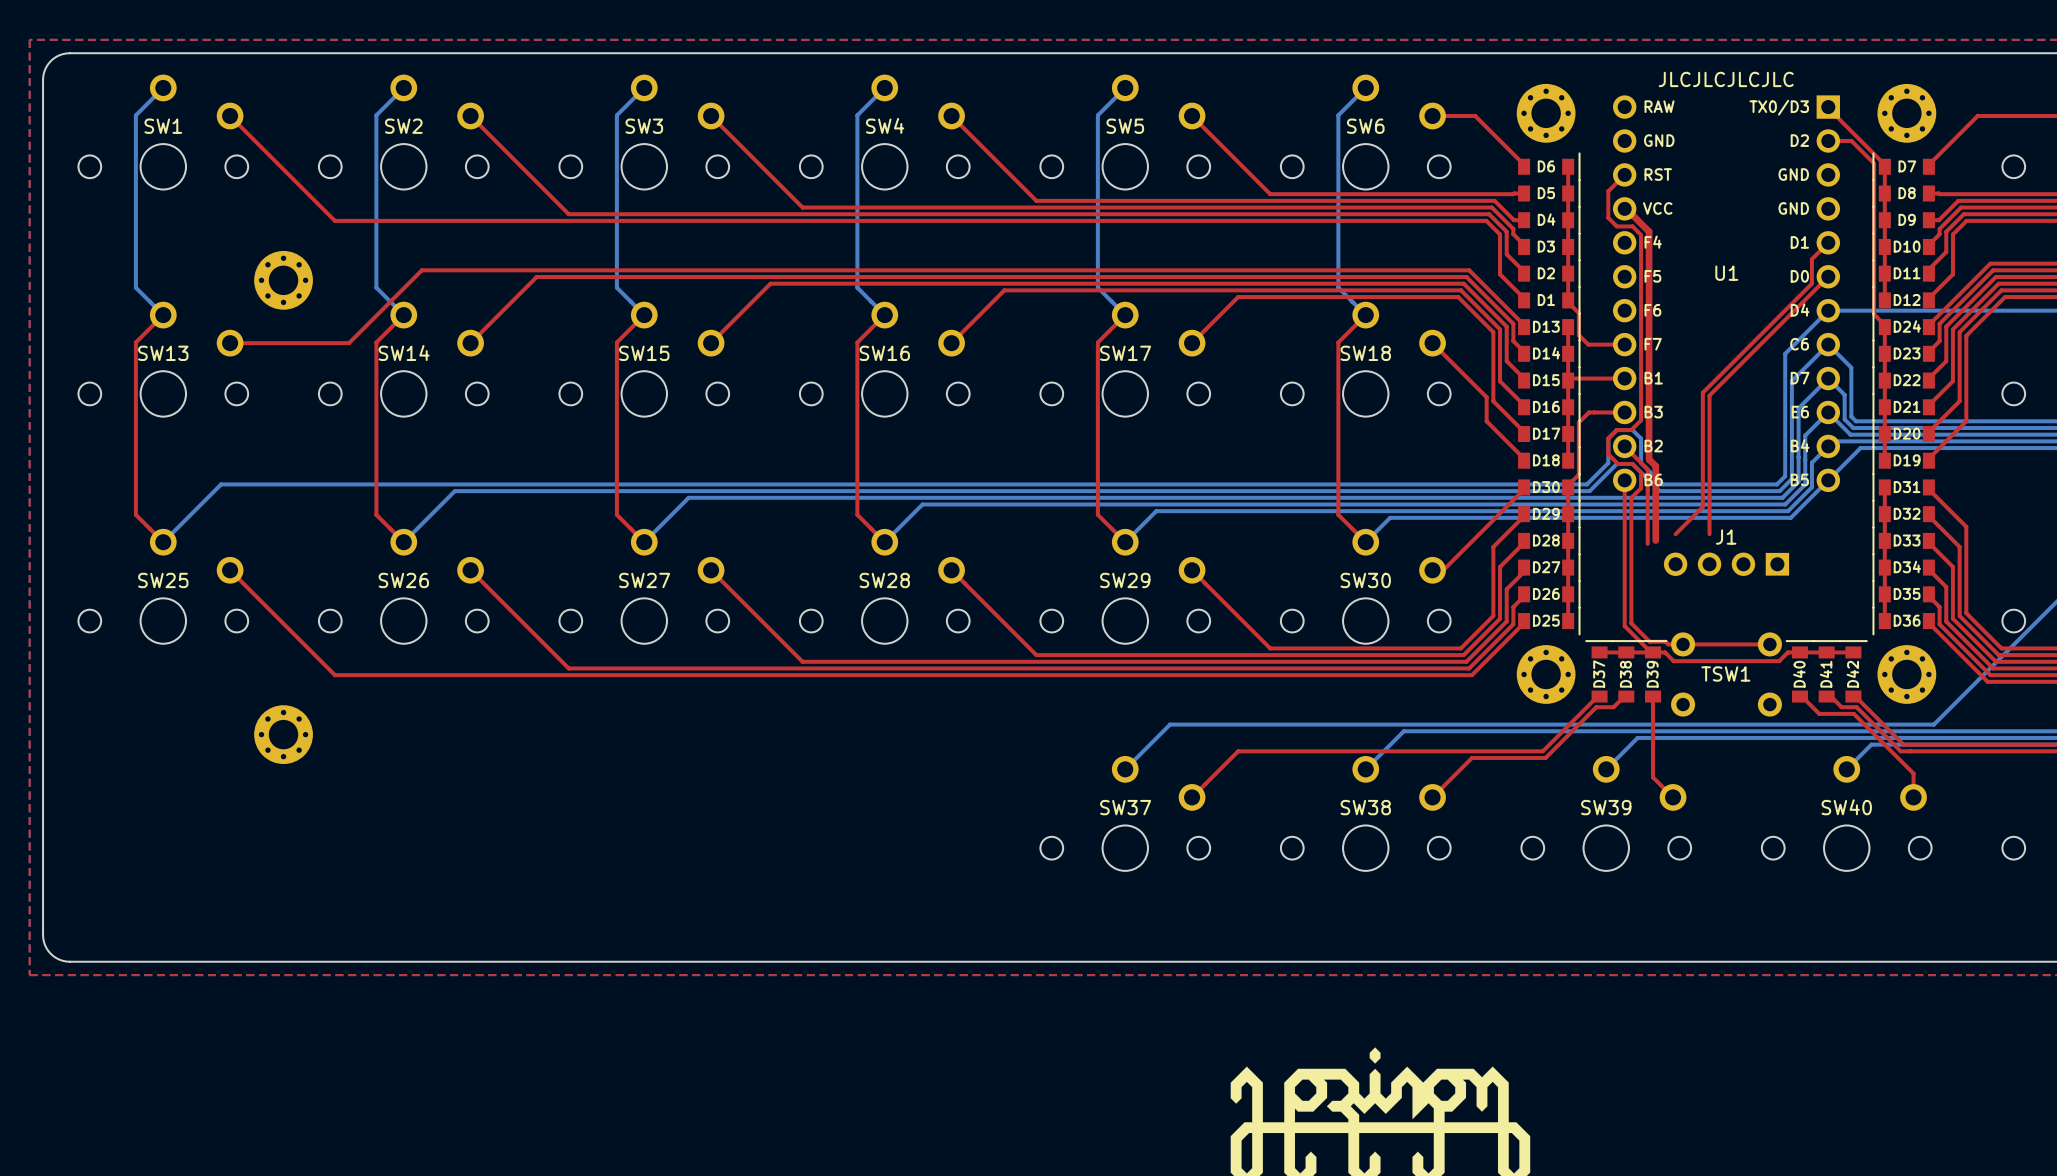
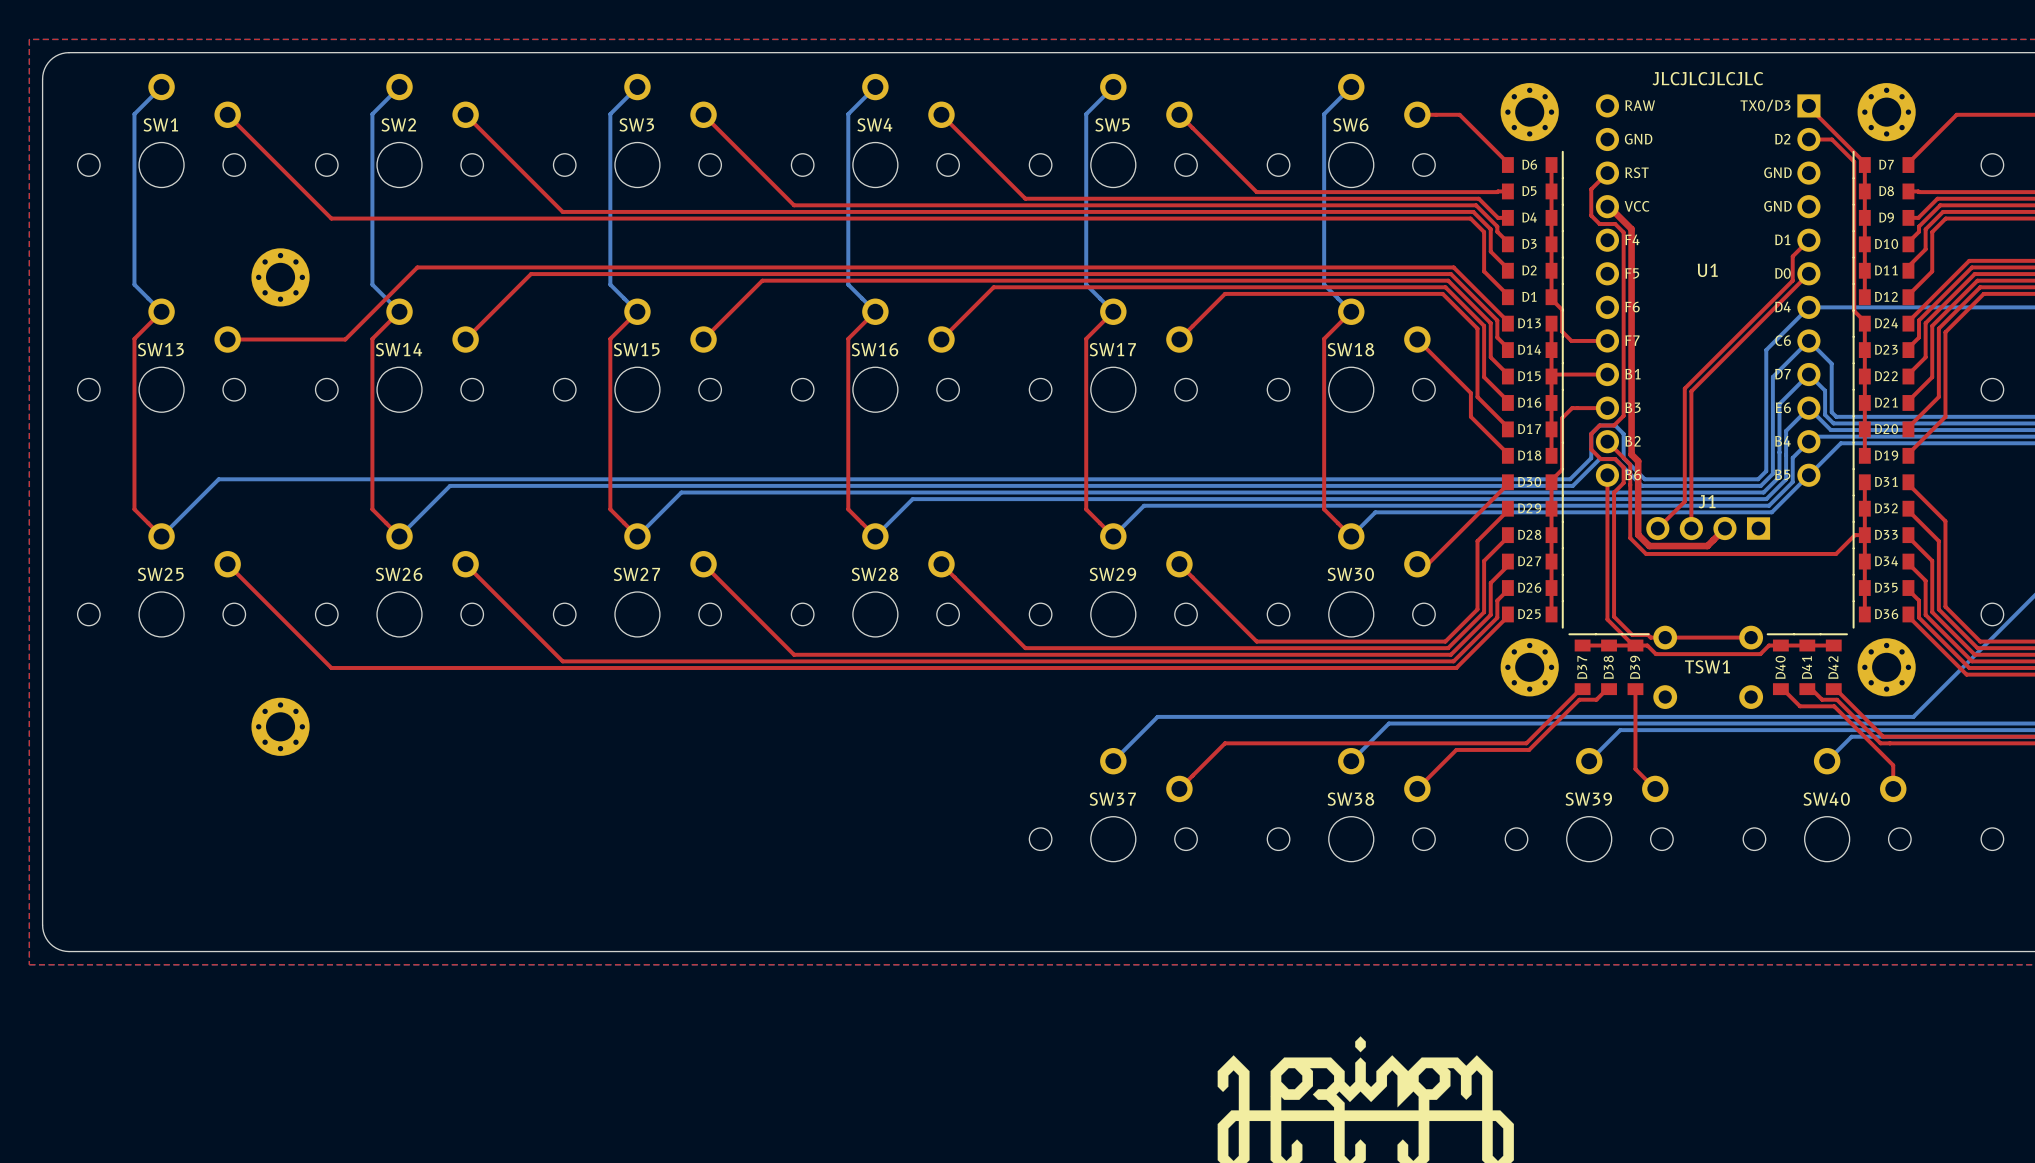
top track: none -> (1724, 528) (1707, 546) (1649, 546) (1638, 534)
top track: none -> (1864, 535) (1854, 535) (1836, 553) (1646, 553) (1630, 538)
J1 position: (1726, 564) -> (1708, 528)

